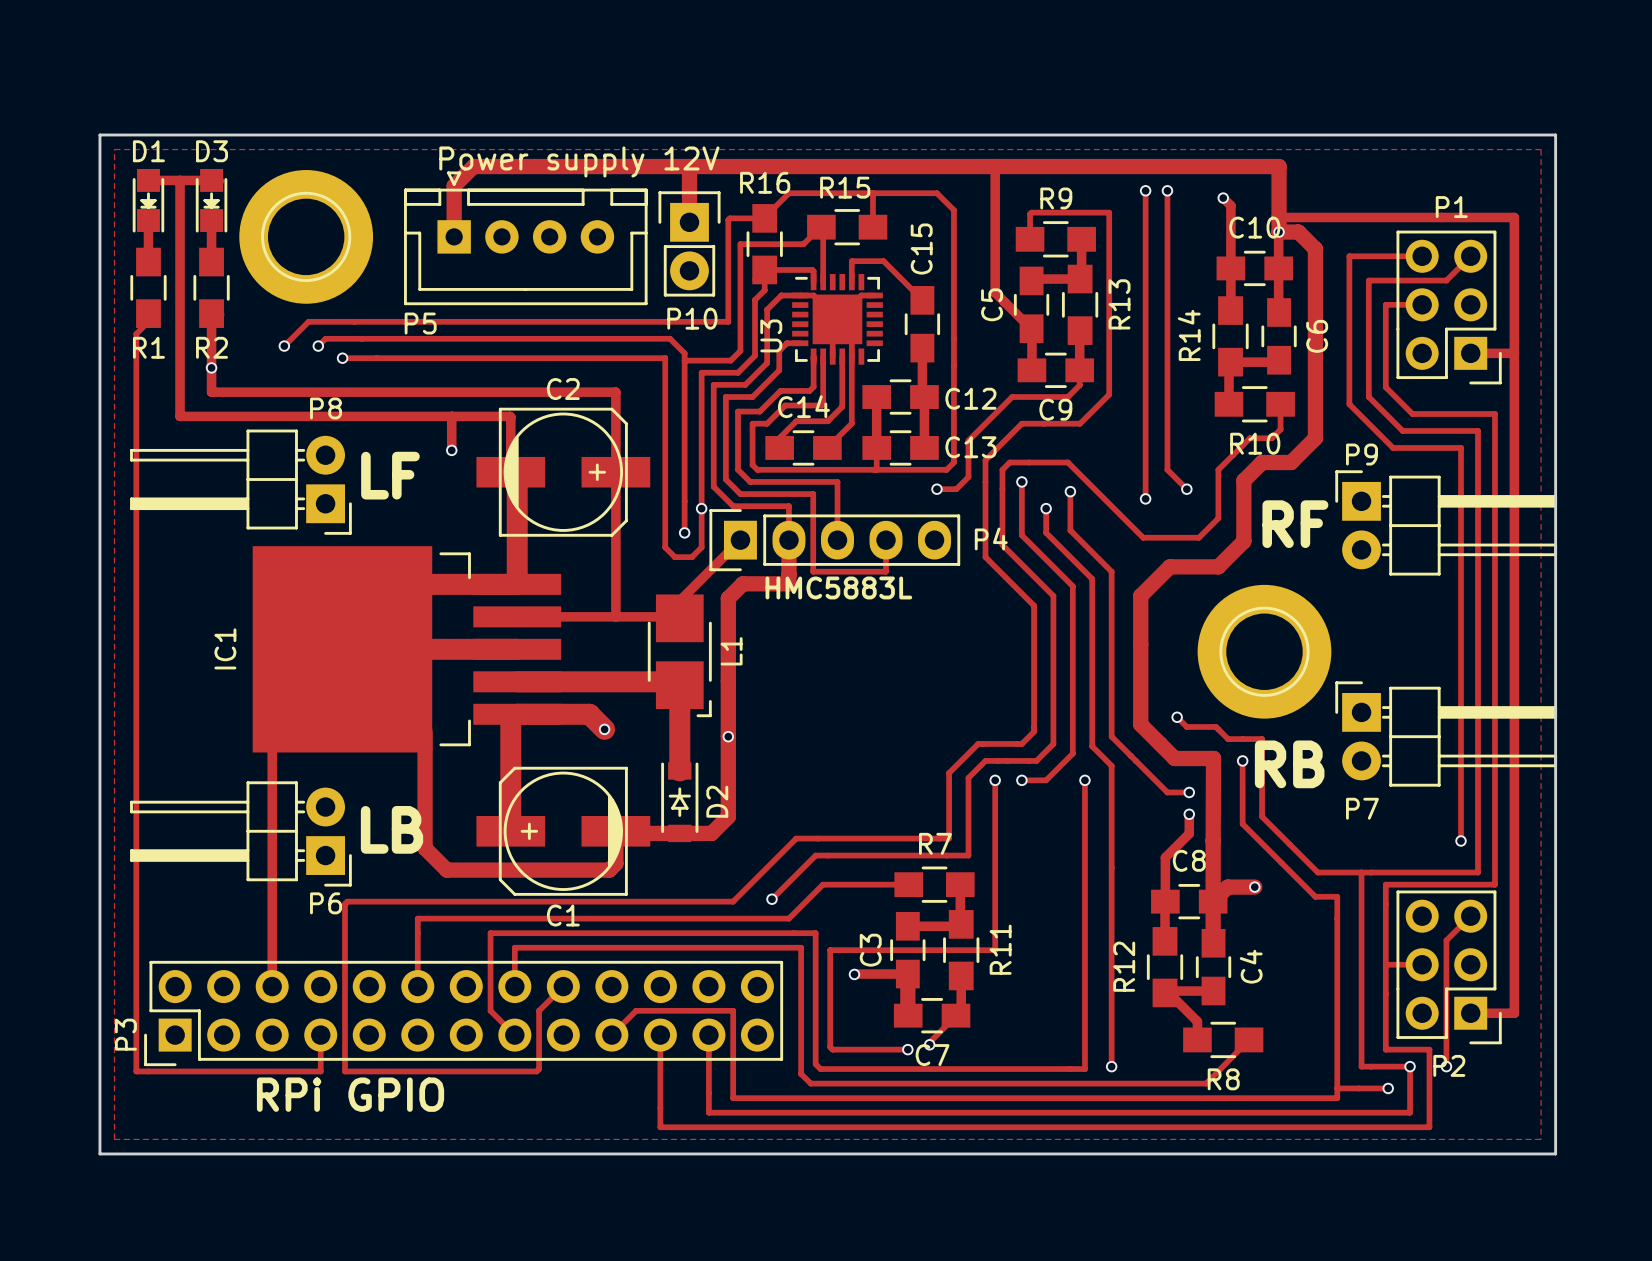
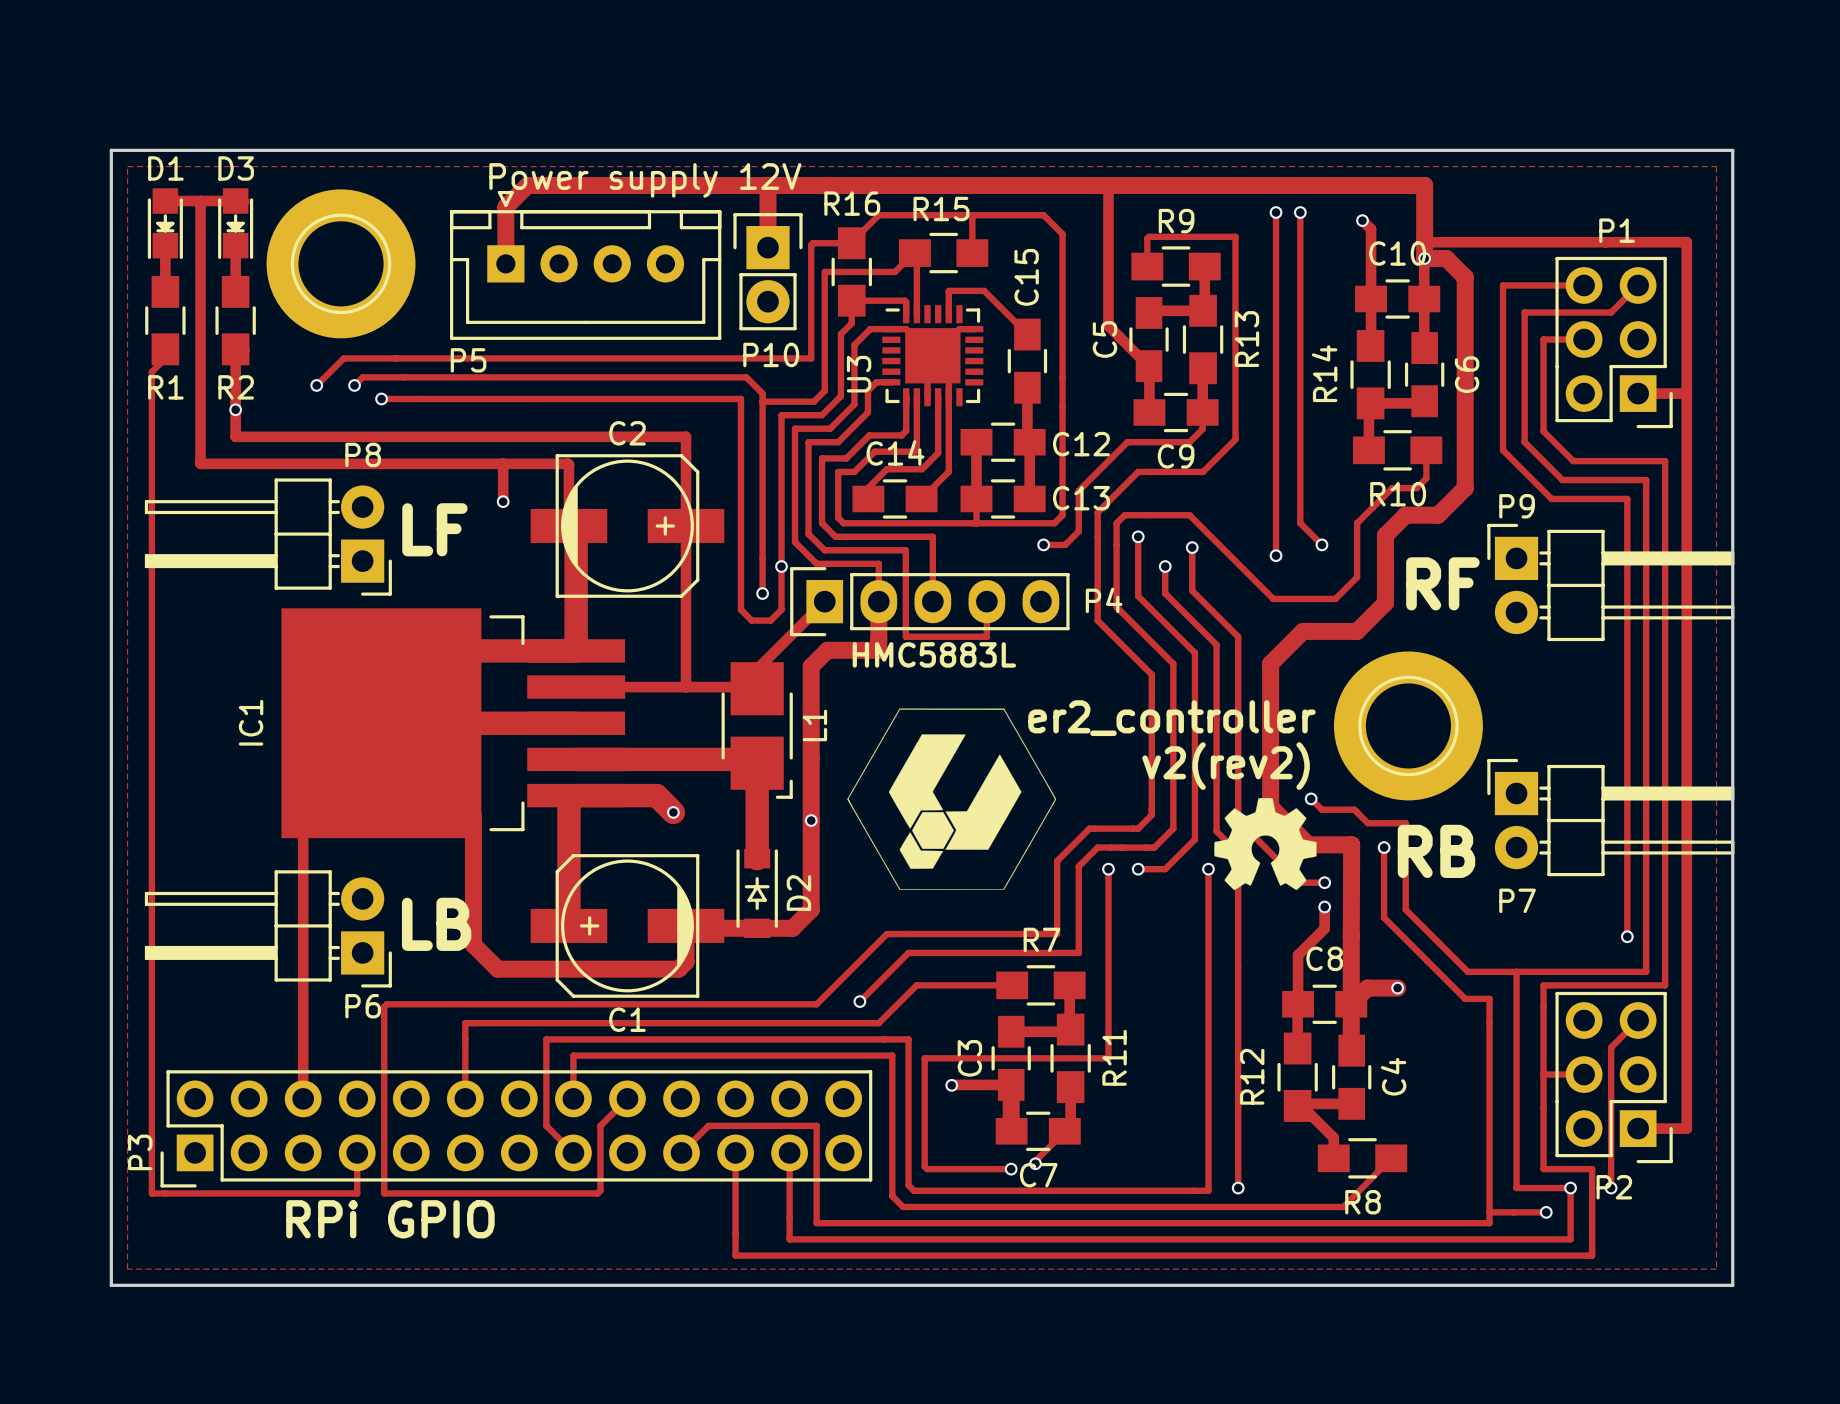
drawing: none -> [847, 708, 1057, 890]
text: none -> er2_controller (1171, 718)
text: none -> v2(rev2) (1226, 766)
drawing: none -> [1214, 798, 1317, 891]

